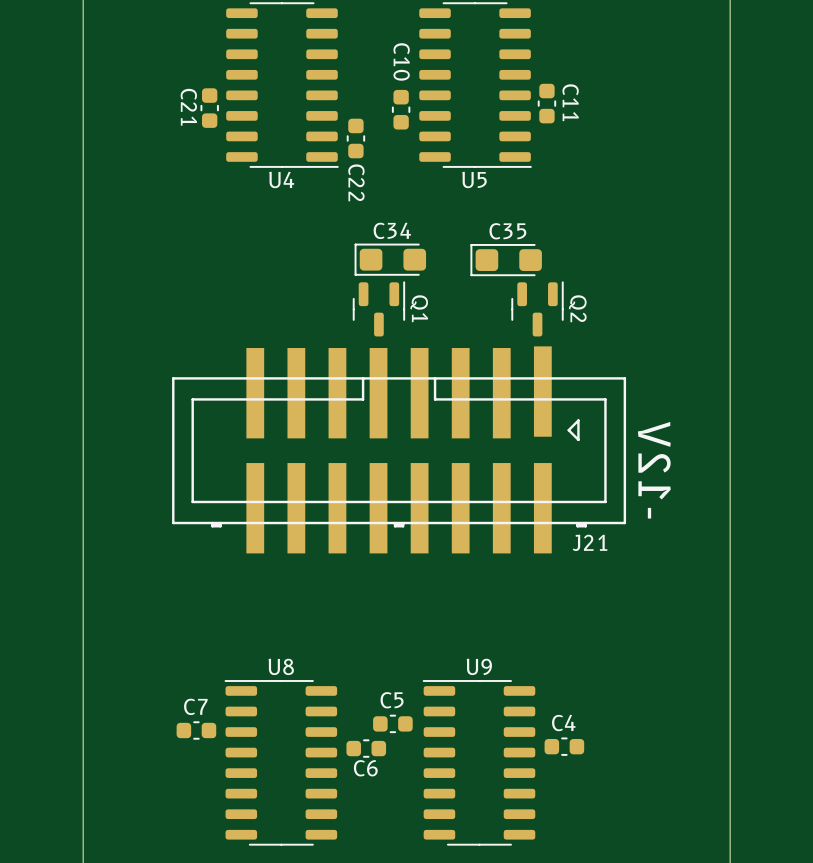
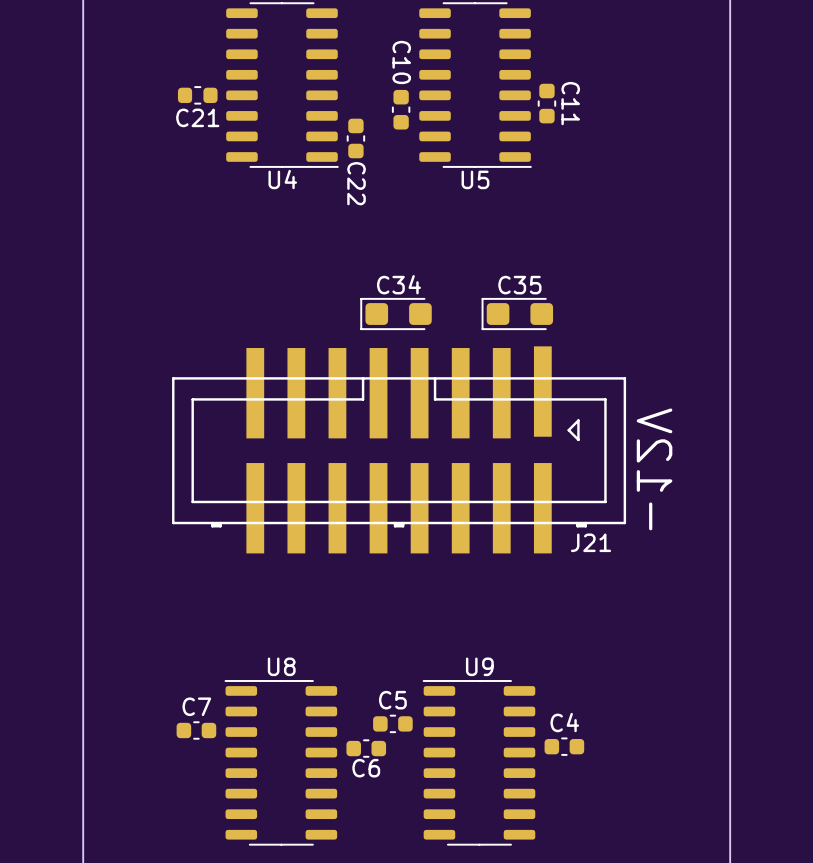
C21 footprint: [200, 88, 219, 128] -> [177, 86, 218, 105]
C34 position: (390, 259) -> (396, 314)
C35 position: (506, 260) -> (517, 314)
Q1: (378, 308) -> none
Q2: (537, 308) -> none

